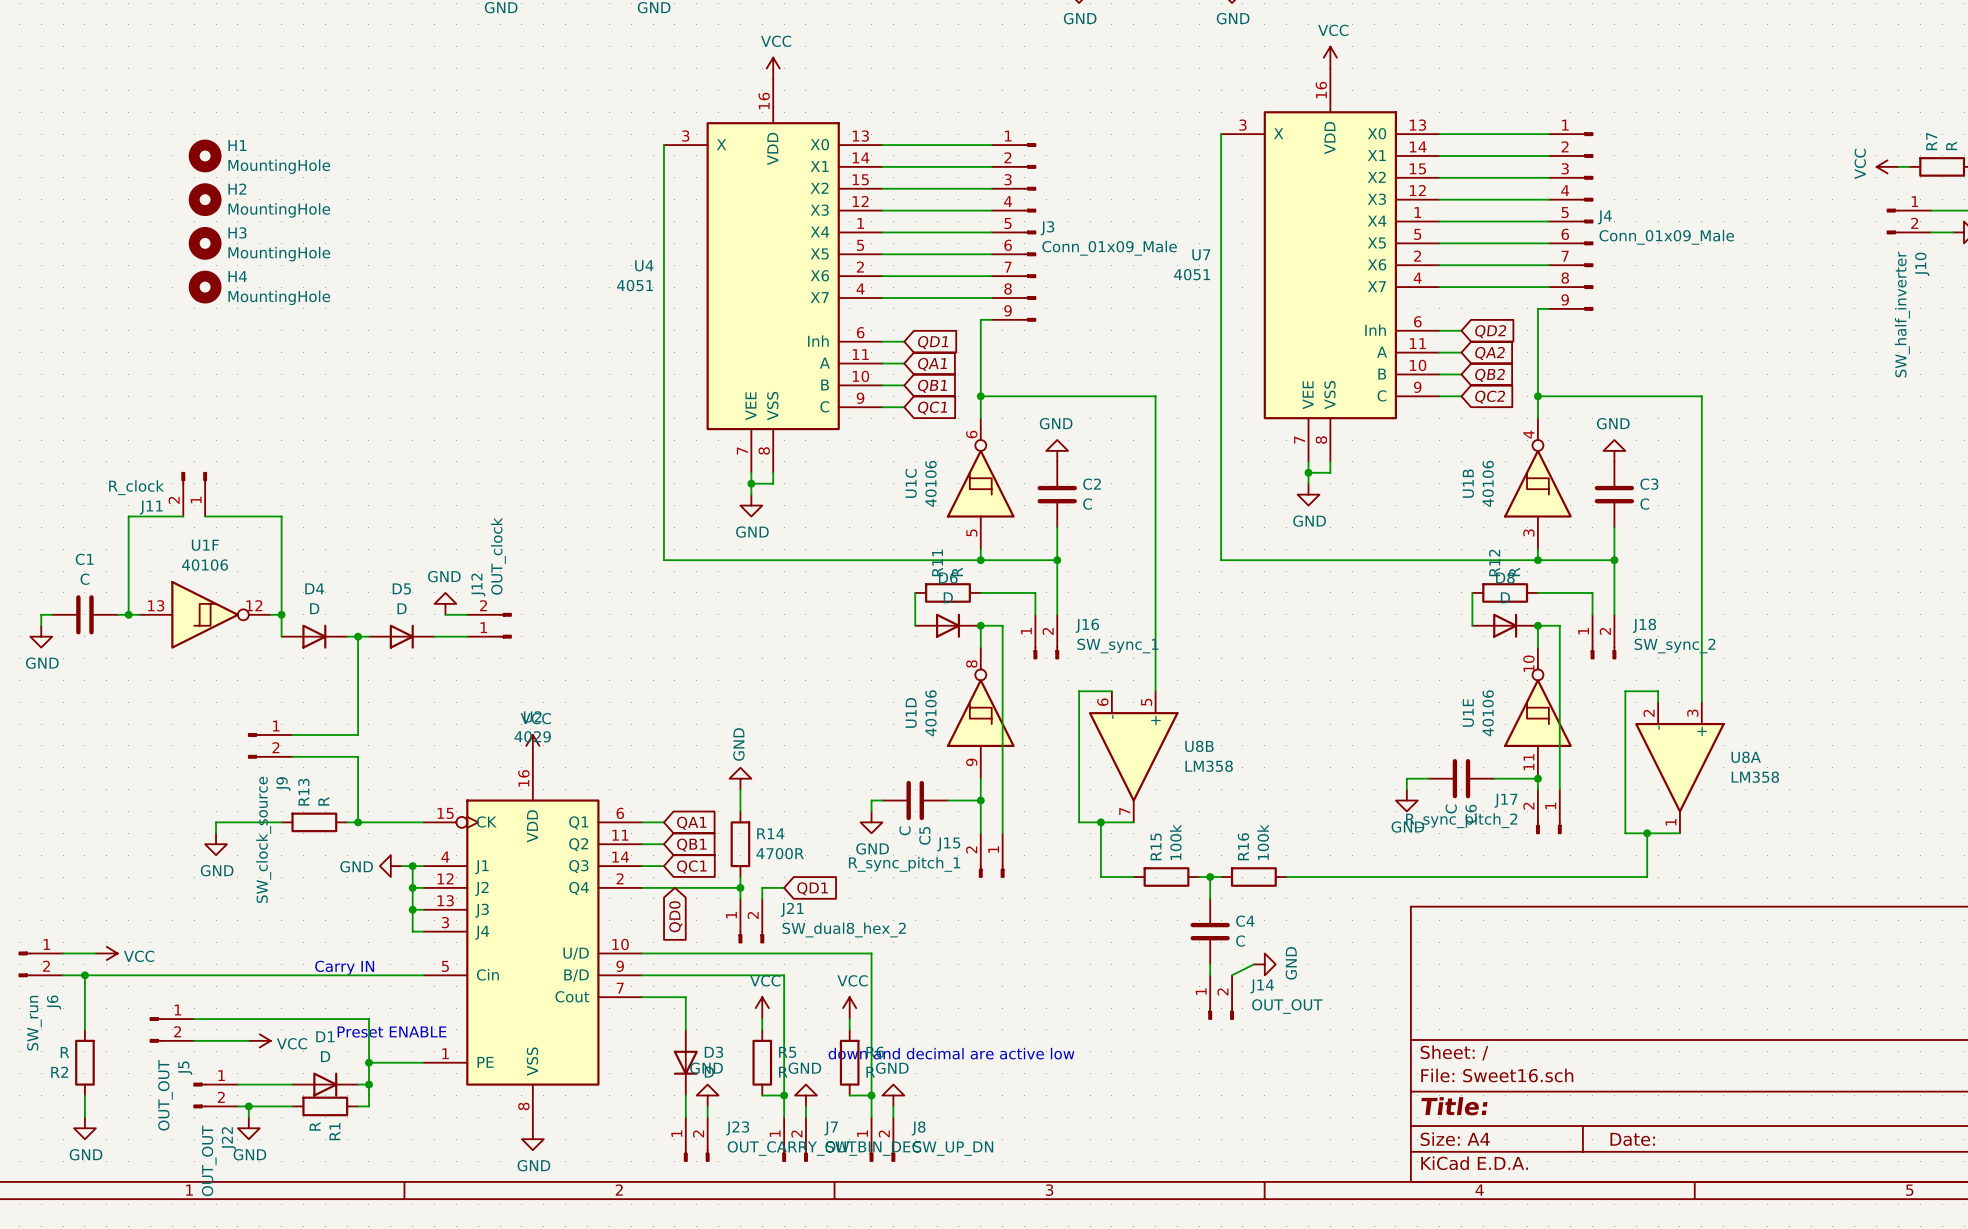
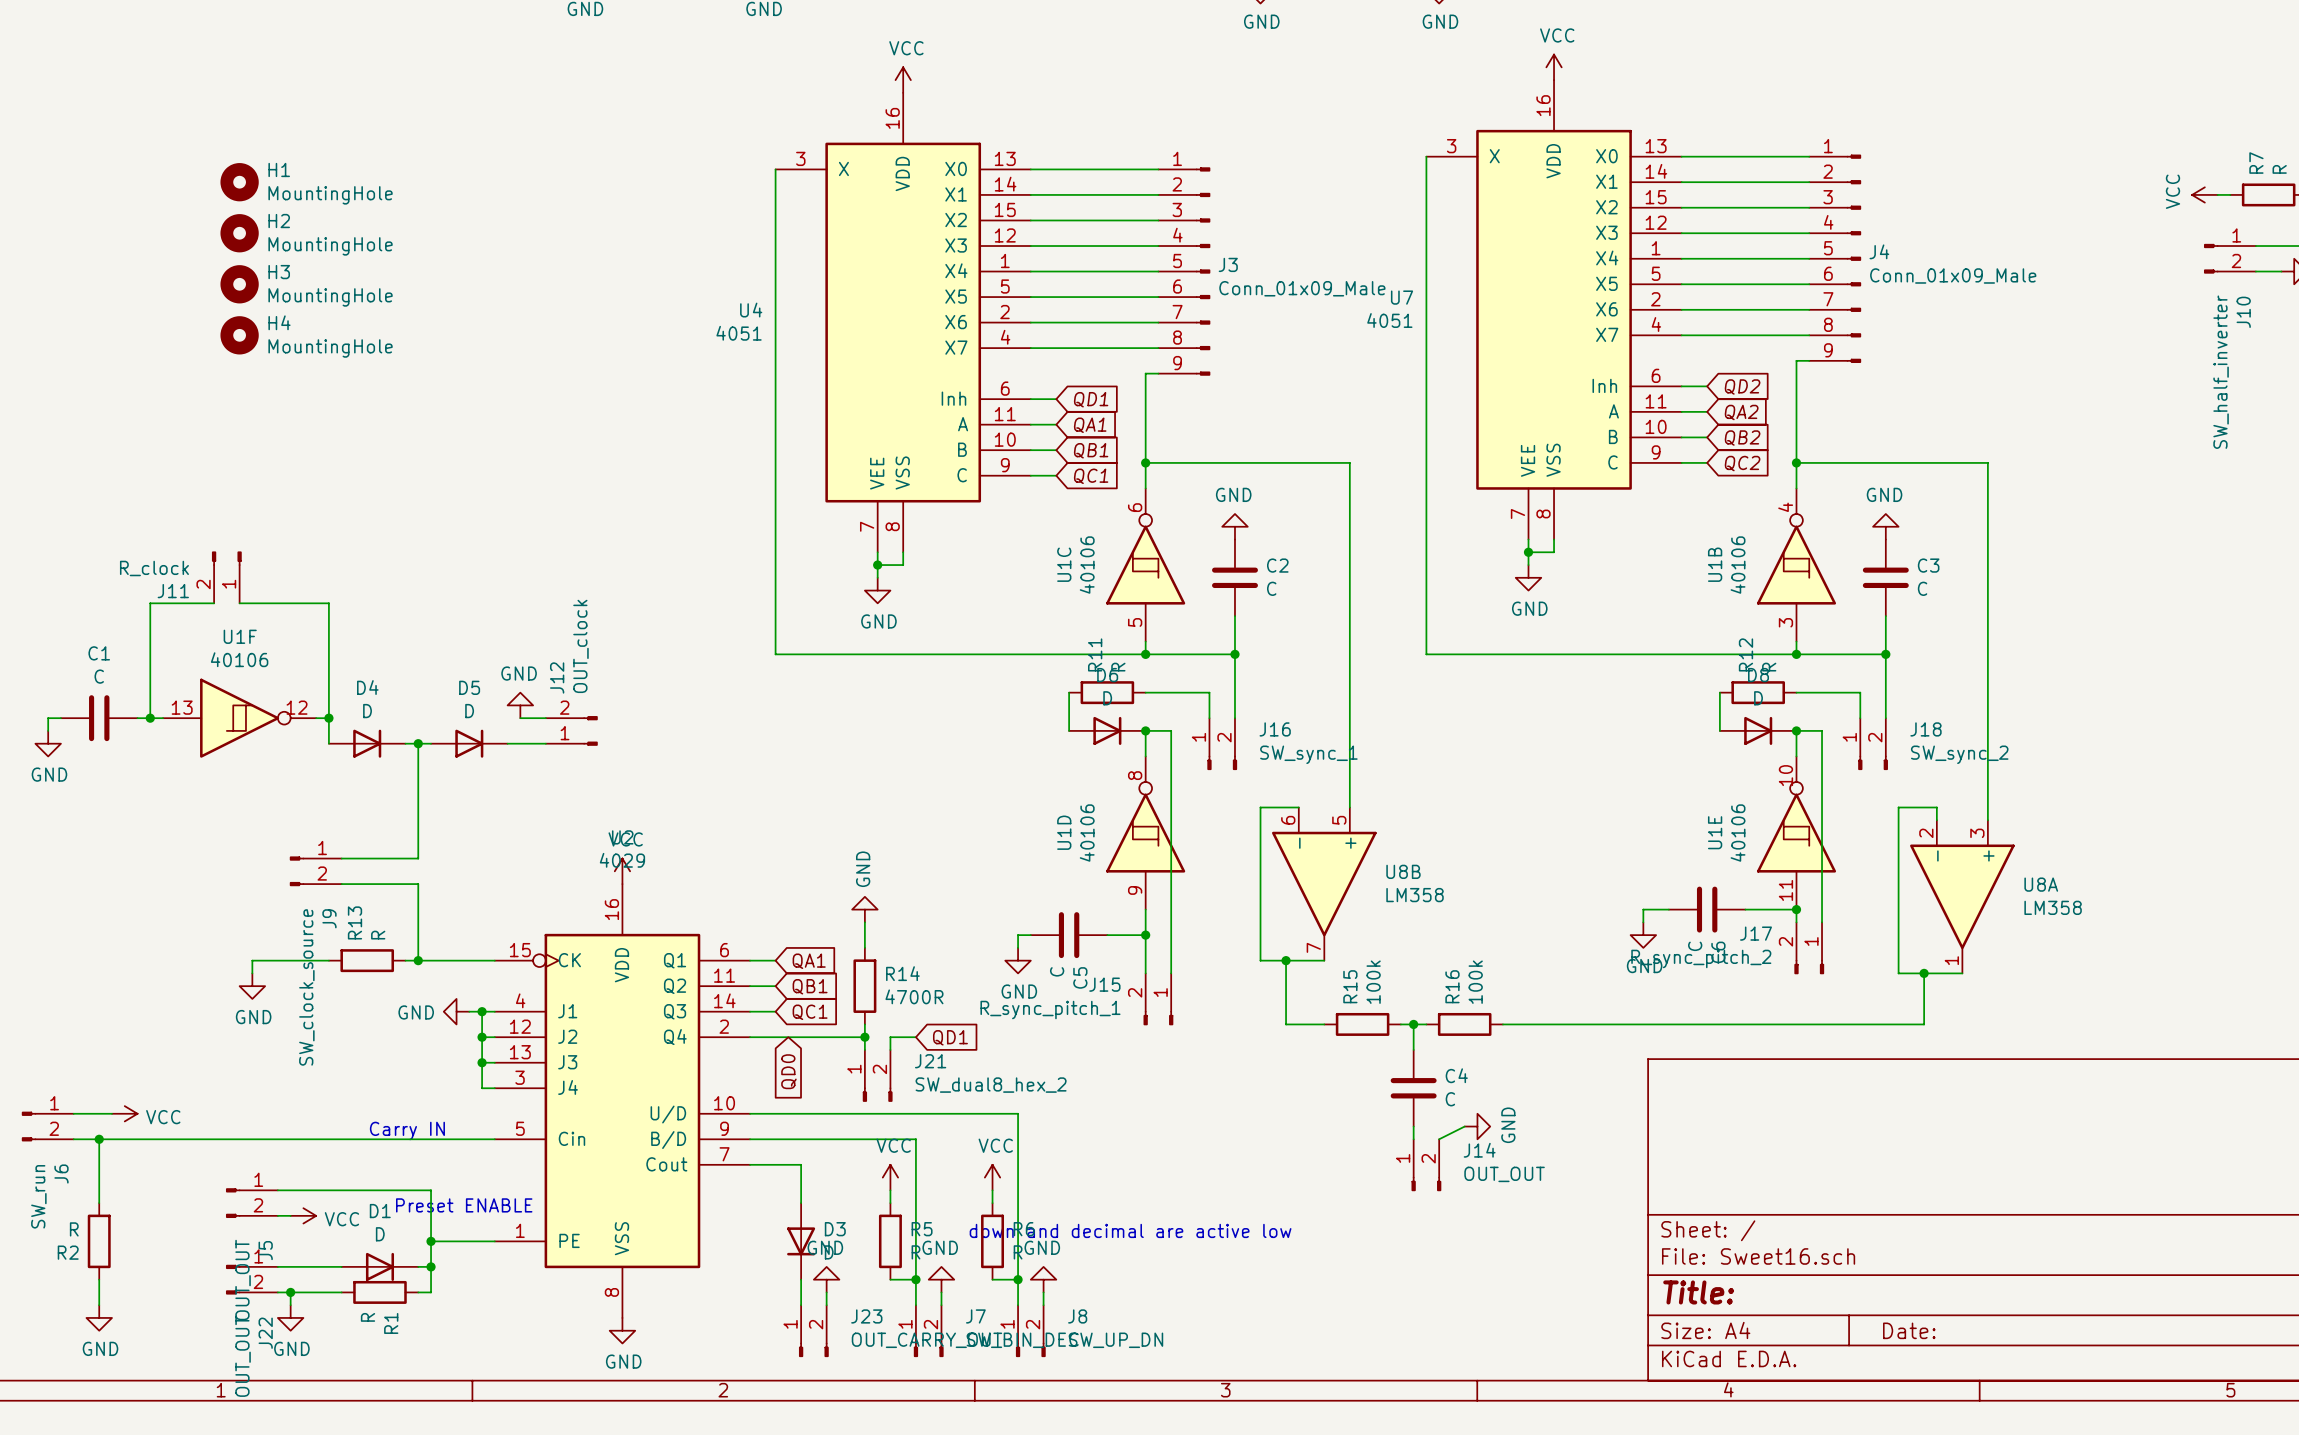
J5 position: (172, 1029) -> (251, 1203)

